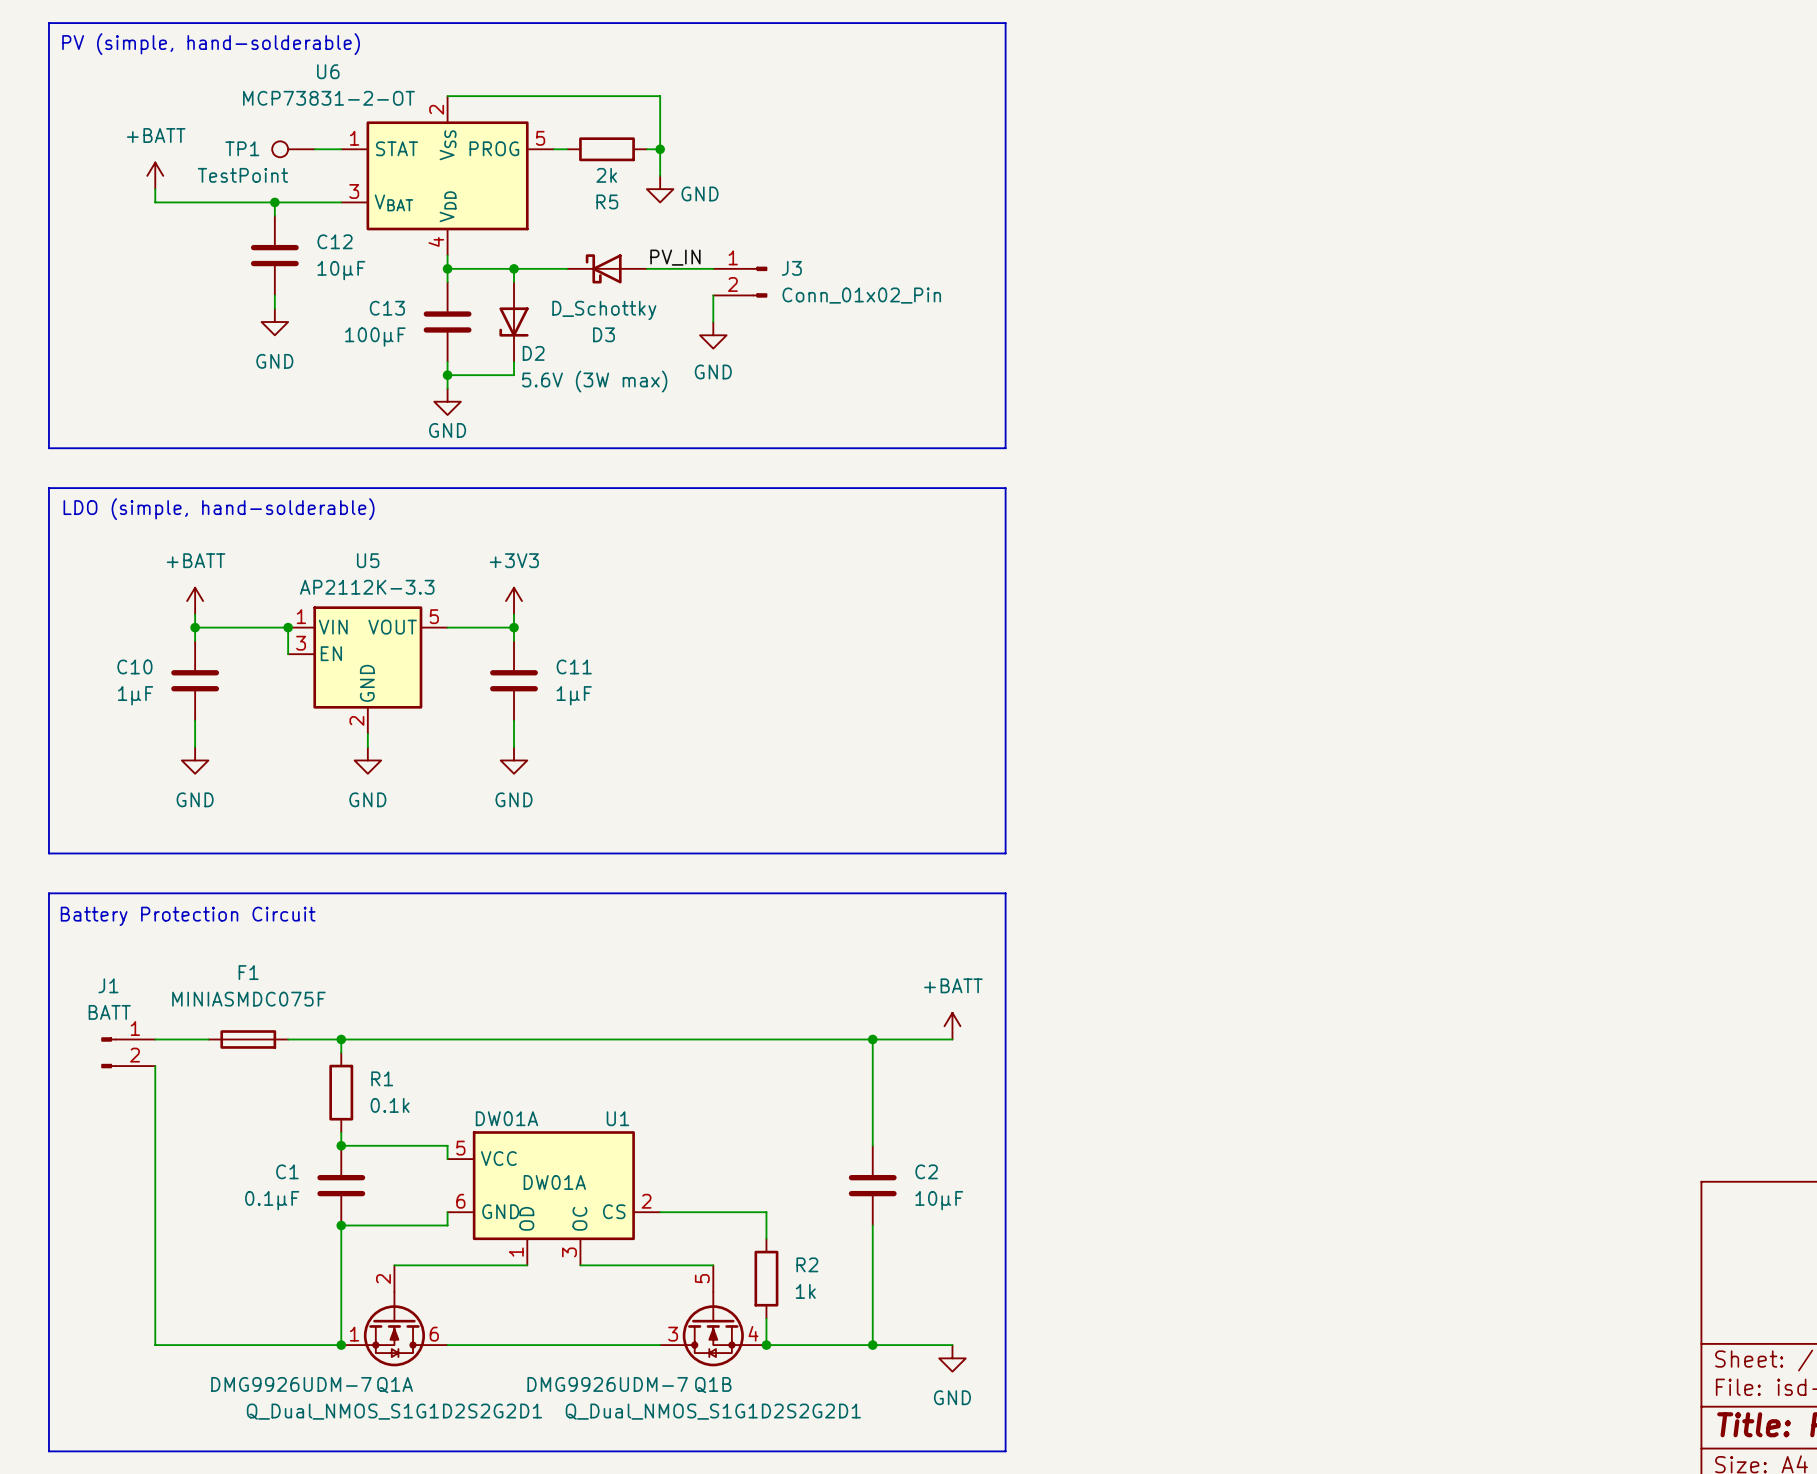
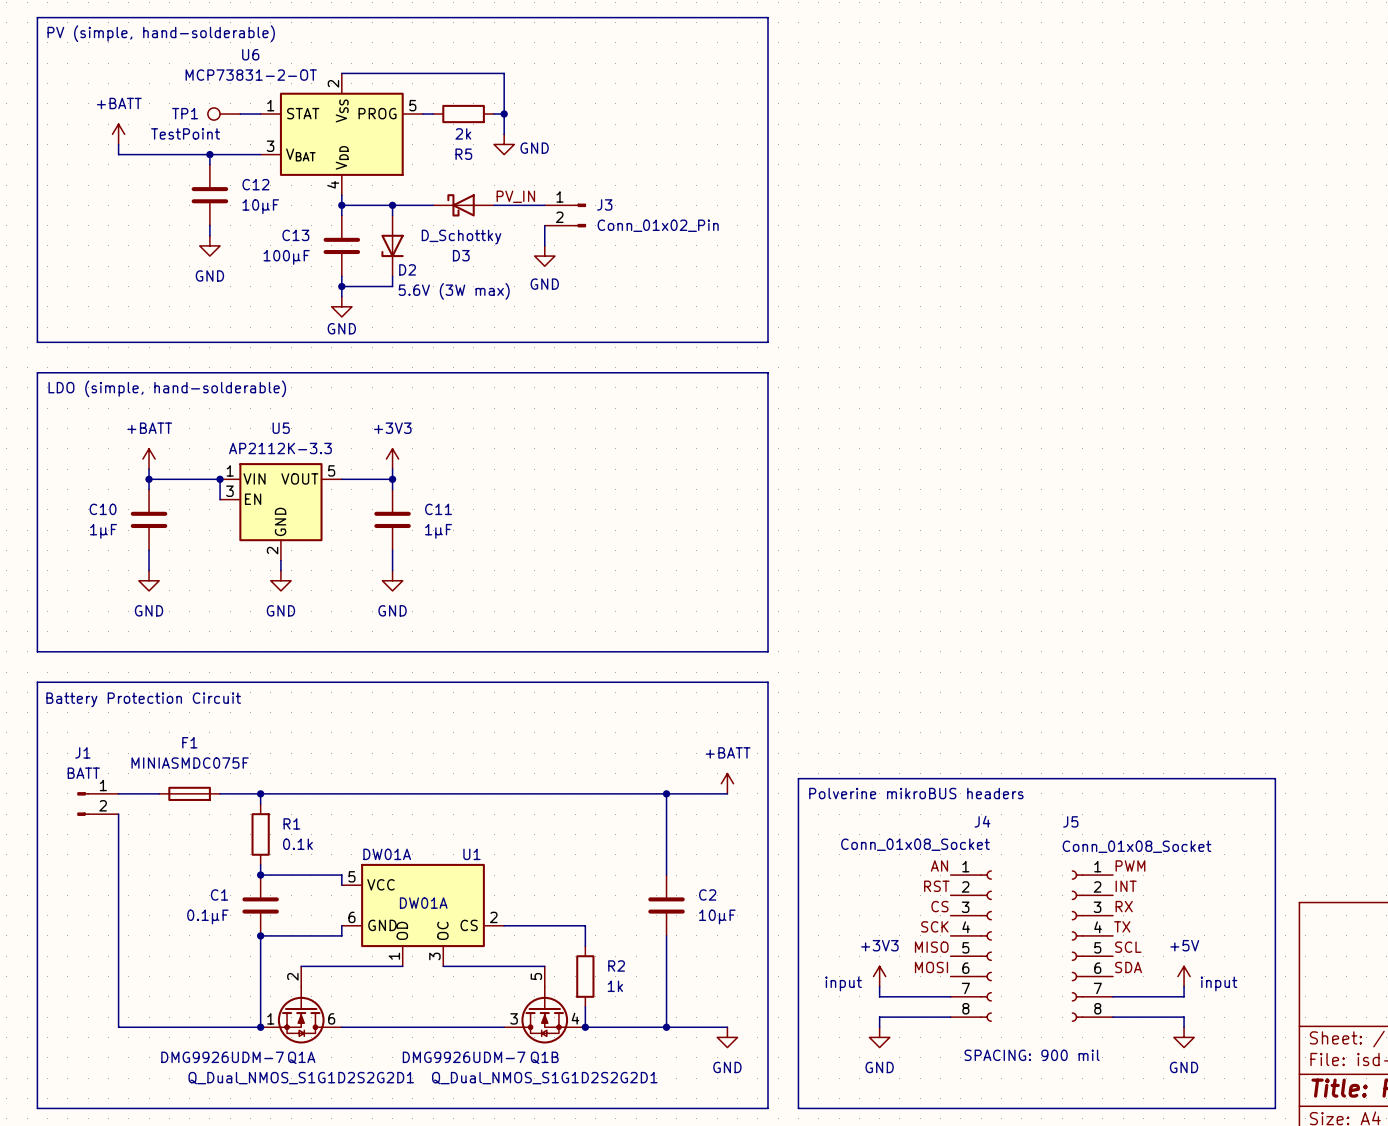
line: none -> (798, 778) (1275, 778) (1275, 1108) (798, 1108) (798, 778)
text: none -> Polverine mikroBUS headers (916, 793)
label: none -> AN (939, 866)
label: none -> PWM (1130, 866)
label: none -> RST (936, 886)
label: none -> INT (1126, 886)
label: none -> CS (939, 906)
label: none -> RX (1124, 906)
label: none -> SCK (934, 926)
label: none -> TX (1122, 926)
J4: none -> Conn_01x08_Socket (971, 946)
J5: none -> Conn_01x08_Socket (1092, 946)
label: none -> MISO (931, 947)
label: none -> SCL (1128, 947)
label: none -> MOSI (931, 967)
label: none -> SDA (1128, 967)
power symbol: none -> +3V3 (879, 976)
power symbol: none -> +5V (1184, 976)
text: none -> input (843, 983)
text: none -> input (1219, 983)
wire: none -> (879, 986) (879, 996) (950, 996)
wire: none -> (1184, 986) (1184, 996) (1113, 996)
wire: none -> (950, 1017) (879, 1017) (879, 1027)
wire: none -> (1113, 1017) (1184, 1017) (1184, 1027)
power symbol: none -> GND (879, 1037)
power symbol: none -> GND (1184, 1037)
text: none -> SPACING: 900 mil (1032, 1055)

